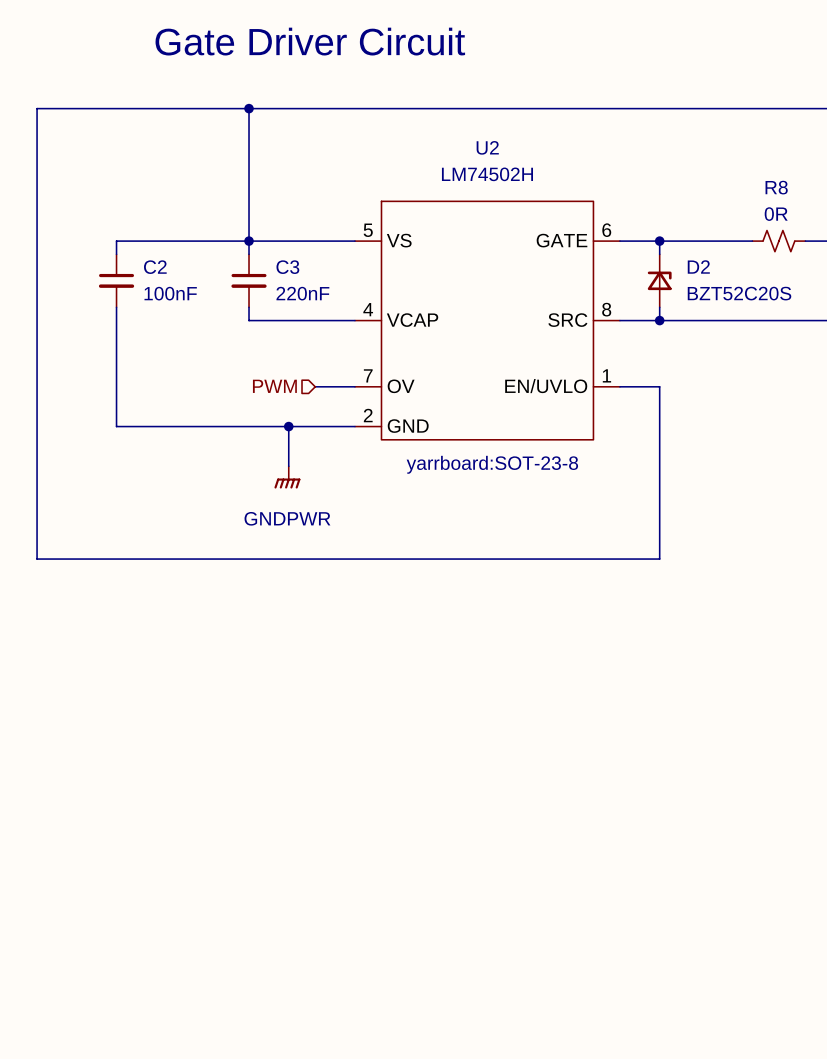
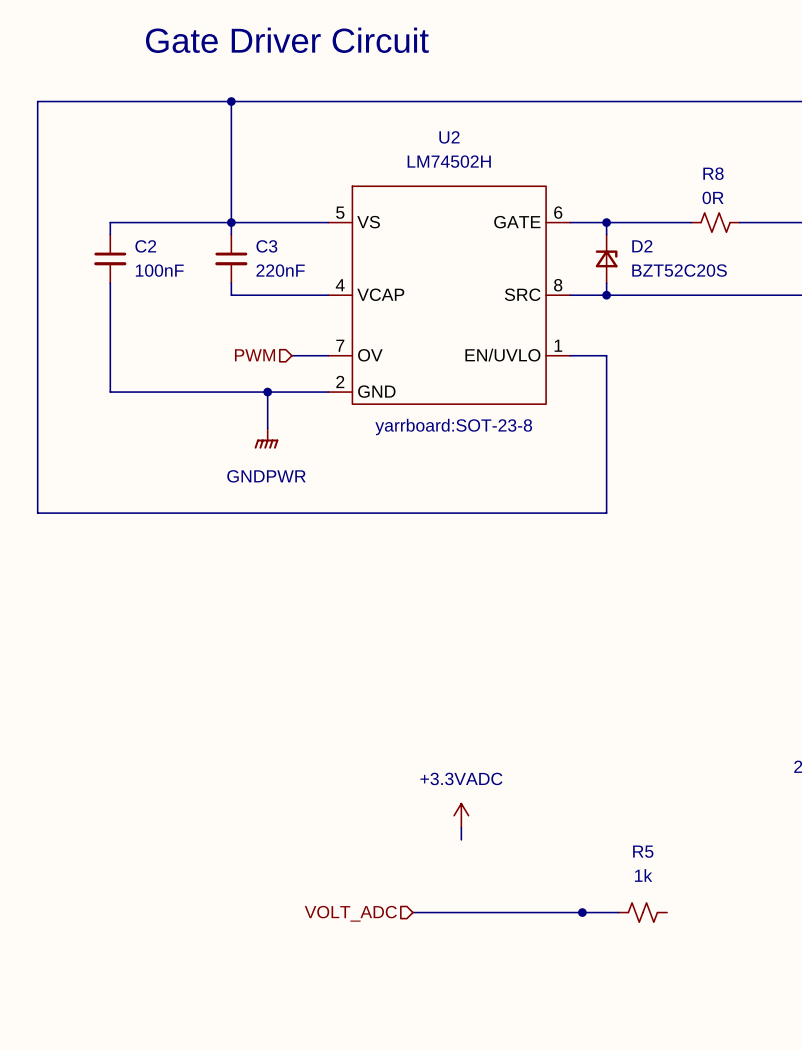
power symbol: none -> +3.3VADC (461, 815)
wire: none -> (461, 827) (461, 839)
wire: none -> (412, 912) (618, 912)
junction: none -> (582, 912)
R5: none -> 1k (642, 912)
hierarchical label: none -> VOLT_ADC (350, 913)

